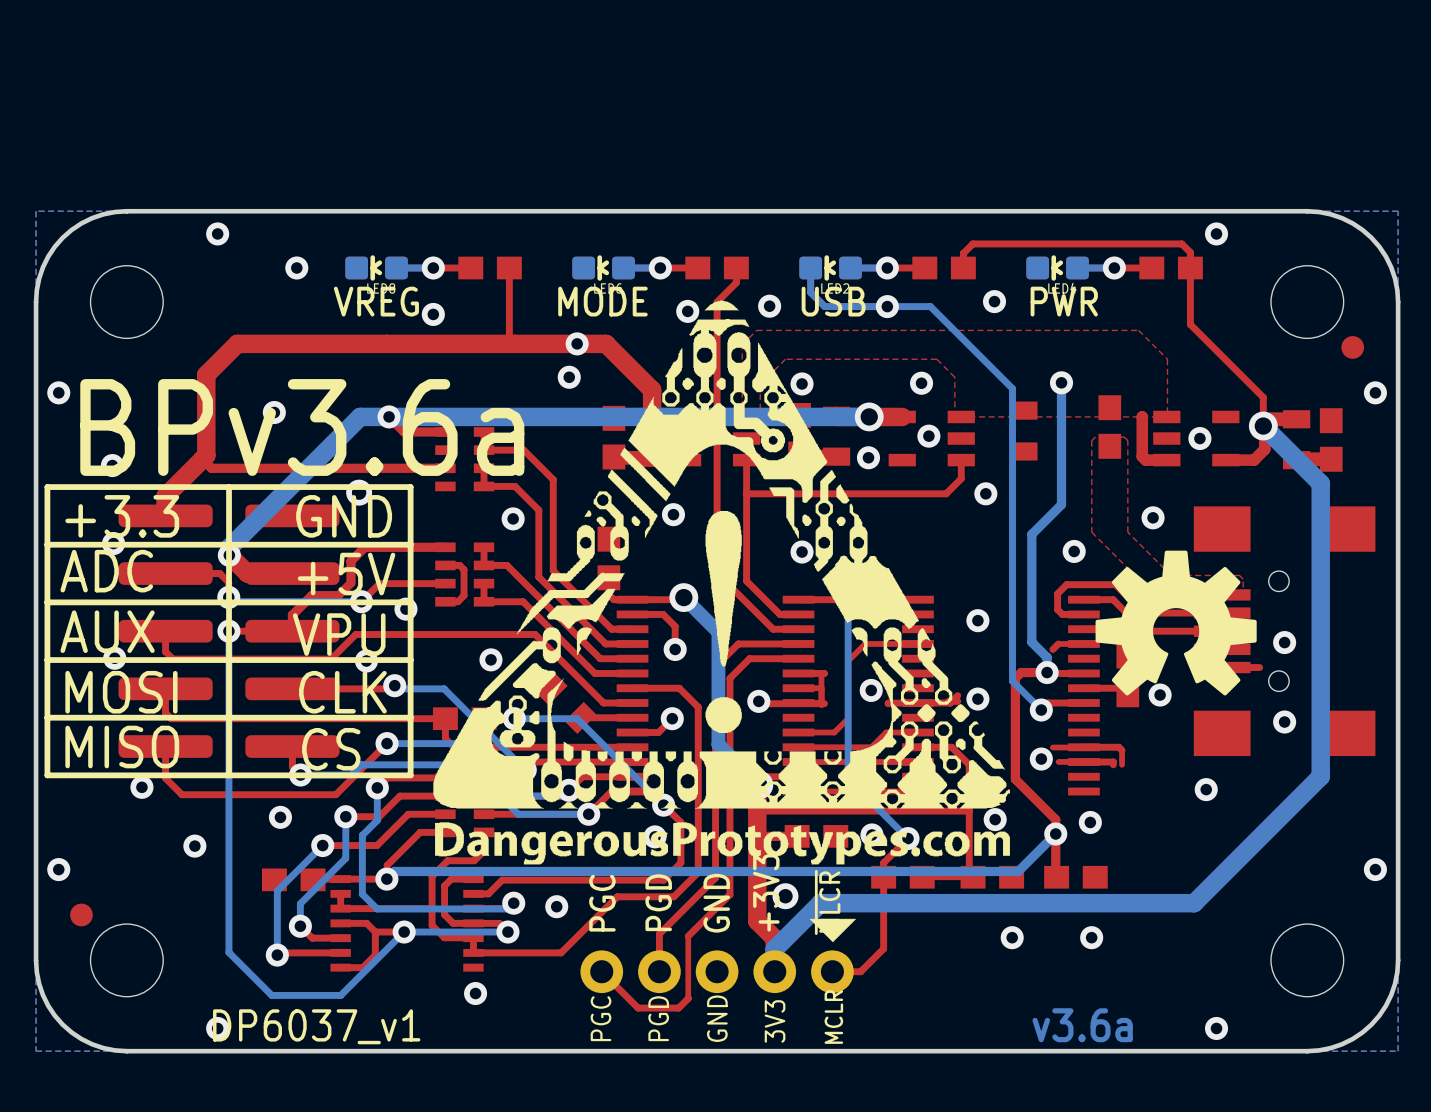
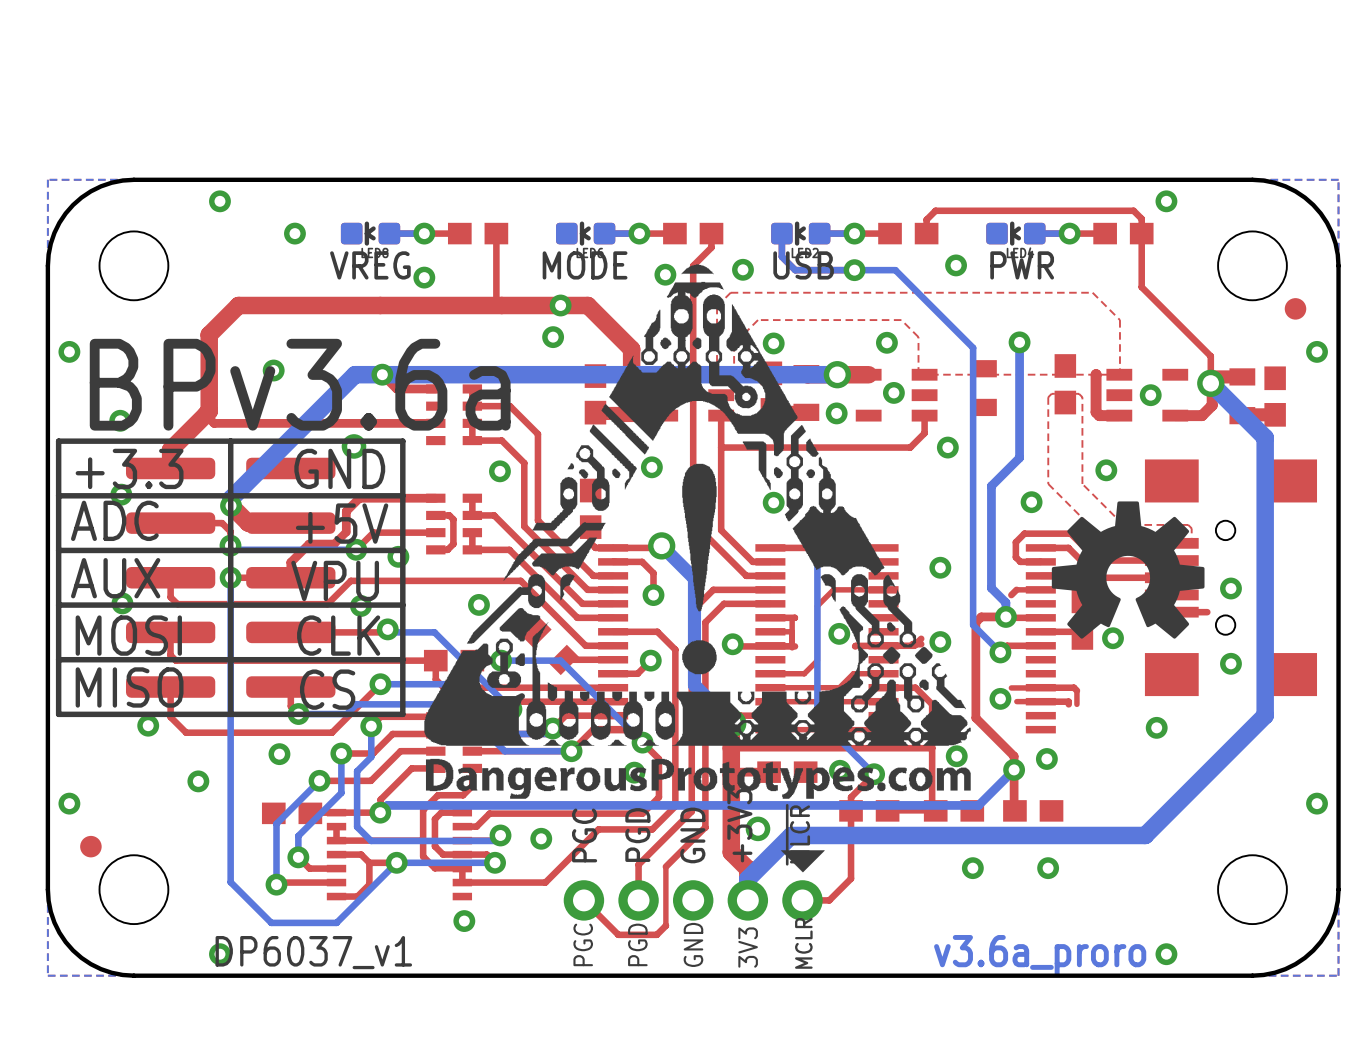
text: v3.6a (1082, 1025) -> v3.6a_proro (1040, 955)

